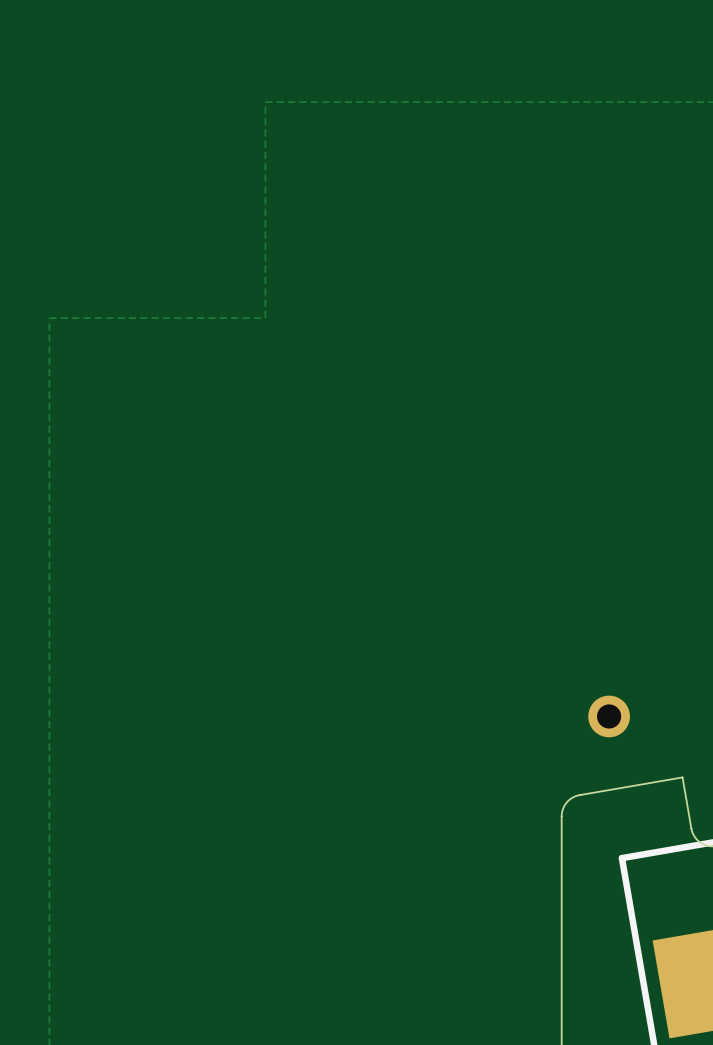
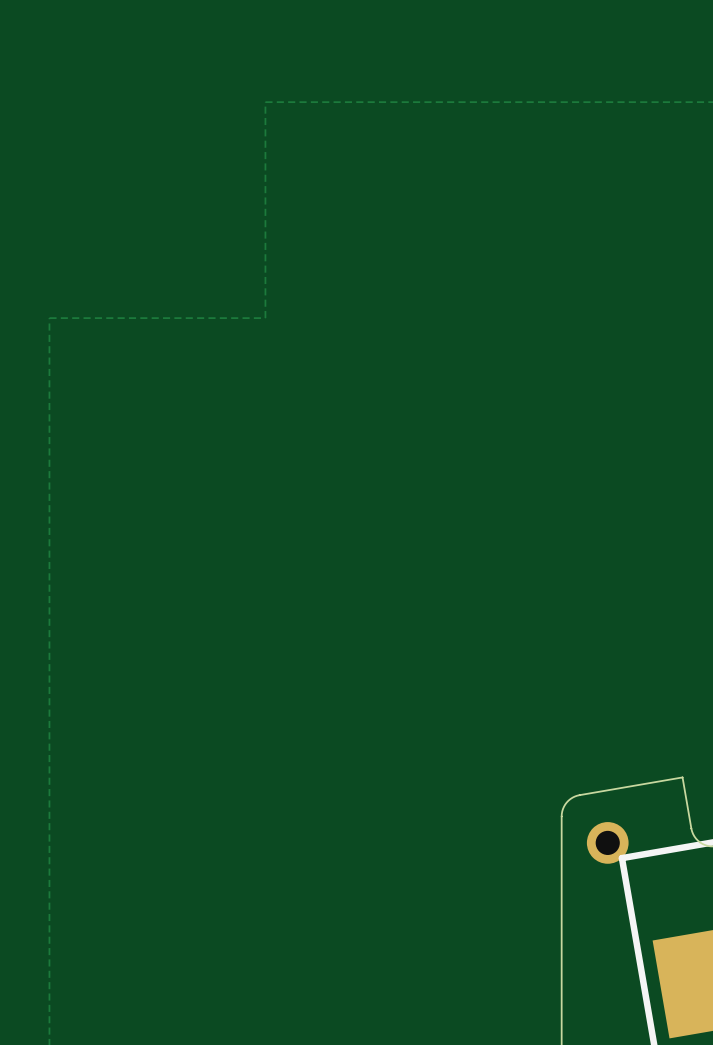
part position: (609, 716) -> (607, 842)

